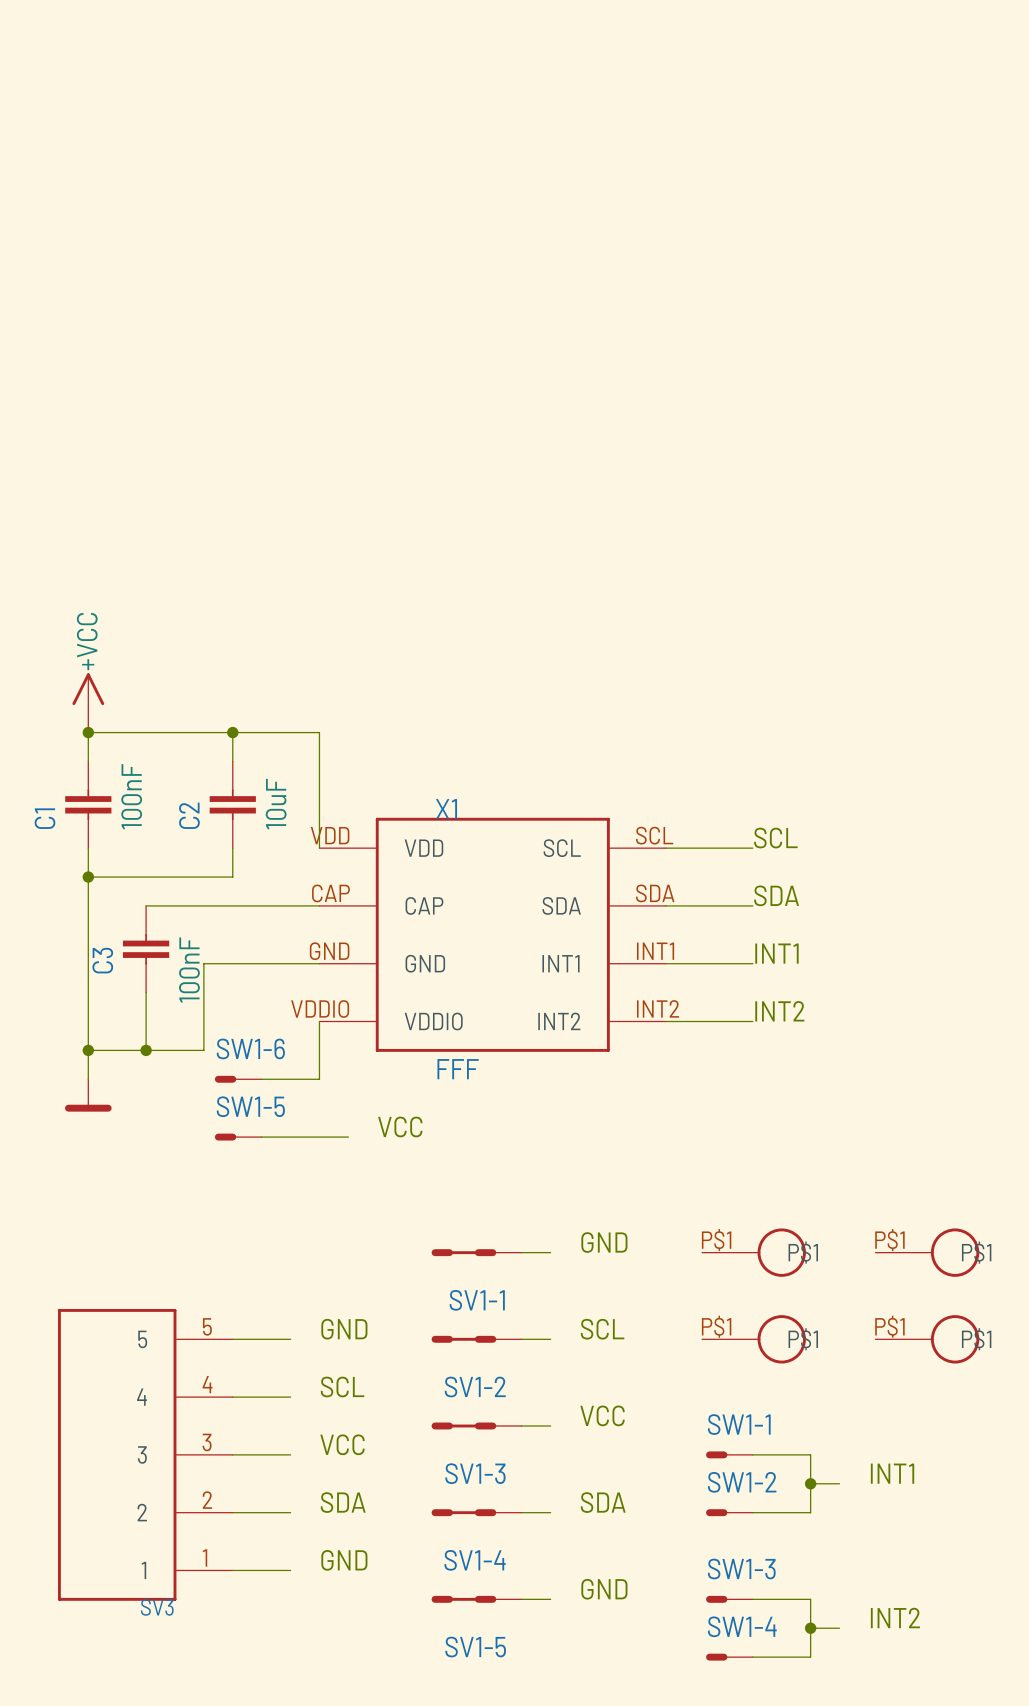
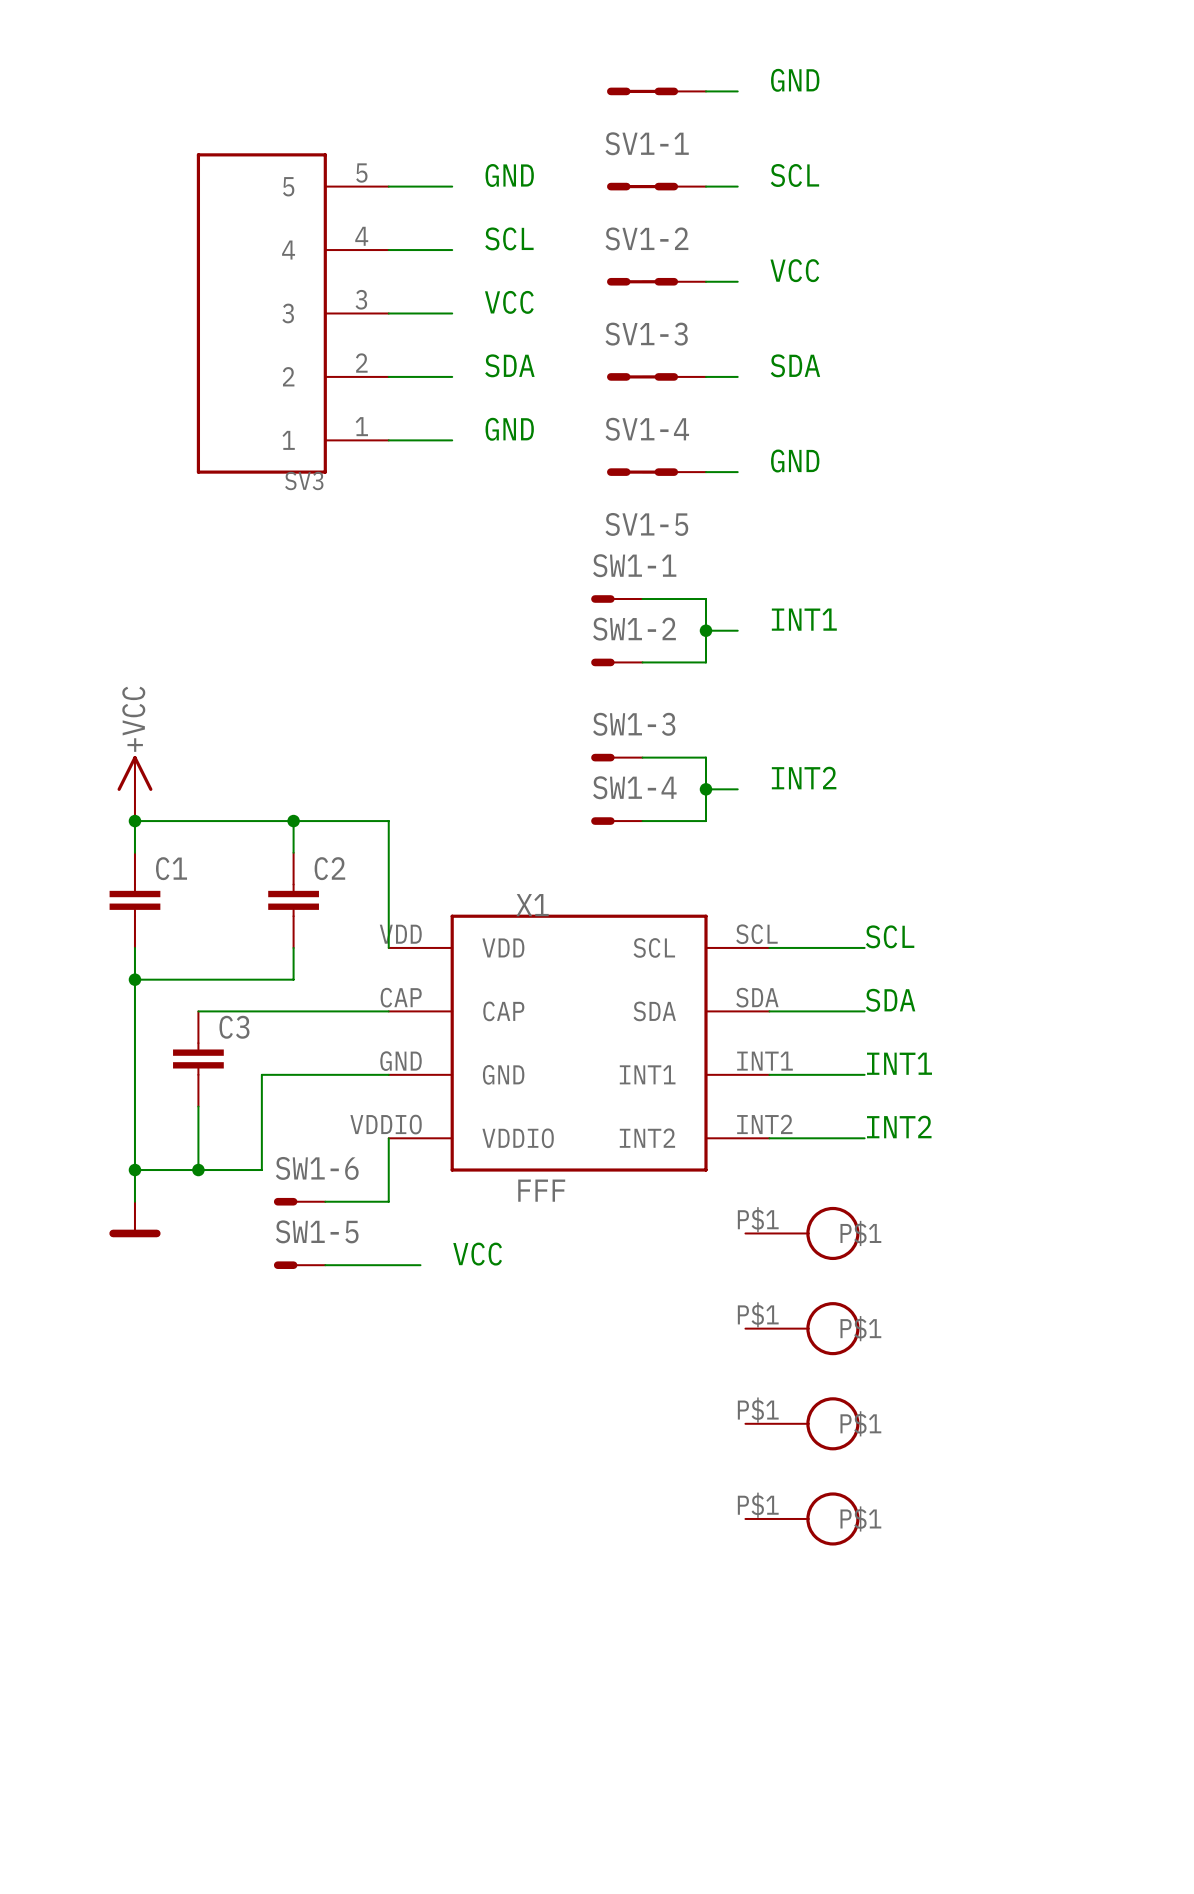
text: none -> GND (795, 80)
wire: none -> (705, 91) (737, 91)
text: none -> GND (509, 175)
text: none -> SCL (794, 175)
wire: none -> (388, 186) (452, 186)
wire: none -> (705, 186) (737, 186)
text: none -> SCL (509, 238)
wire: none -> (388, 250) (452, 250)
text: none -> VCC (794, 270)
wire: none -> (705, 281) (737, 281)
text: none -> VCC (509, 302)
wire: none -> (388, 313) (452, 313)
text: none -> SDA (509, 365)
text: none -> SDA (795, 365)
wire: none -> (388, 376) (452, 376)
wire: none -> (705, 376) (737, 376)
text: none -> GND (509, 429)
wire: none -> (388, 440) (452, 440)
text: none -> GND (795, 461)
wire: none -> (705, 472) (737, 472)
wire: none -> (642, 598) (705, 598) (705, 662) (642, 662)
text: none -> INT1 (804, 619)
wire: none -> (705, 630) (737, 630)
junction: none -> (705, 630)
wire: none -> (642, 757) (705, 757) (705, 821) (642, 821)
text: none -> INT2 (804, 778)
wire: none -> (705, 789) (737, 789)
junction: none -> (705, 789)
C1 value: 100nF (131, 796) -> none
C2 value: 10uF (276, 804) -> none
C2 name rotation: 0° (189, 815) -> 90° clockwise (329, 868)
C2 name position: C2 (189, 815) -> C2 (329, 868)
C1 name rotation: 0° (44, 818) -> 90° clockwise (171, 868)
C1 name position: C1 (44, 818) -> C1 (171, 868)
C3 name rotation: 0° (102, 960) -> 90° clockwise (234, 1027)
C3 name position: C3 (102, 960) -> C3 (234, 1027)
C3 value: 100nF (189, 970) -> none
part: none -> (802, 1233)
part: none -> (802, 1328)
text: GND (604, 1242) -> none
SV1-1 position: (476, 1252) -> (656, 91)
wire: (521, 1252) (550, 1252) -> none
part: (754, 1252) -> none
part: (927, 1252) -> none
part: none -> (802, 1423)
text: GND (344, 1329) -> none
text: SCL (602, 1329) -> none
wire: (232, 1339) (290, 1339) -> none
SV1-2 position: (476, 1339) -> (656, 186)
wire: (521, 1339) (550, 1339) -> none
part: (754, 1339) -> none
part: (927, 1339) -> none
part: none -> (802, 1518)
text: SCL (342, 1387) -> none
wire: (232, 1397) (290, 1397) -> none
text: VCC (602, 1415) -> none
SV1-3 position: (476, 1425) -> (656, 281)
wire: (521, 1425) (550, 1425) -> none
text: VCC (342, 1444) -> none
SV3 position: (145, 1454) -> (292, 313)
wire: (232, 1454) (290, 1454) -> none
SW1-1 position: (729, 1454) -> (616, 598)
wire: (752, 1454) (810, 1454) (810, 1512) (752, 1512) -> none
text: INT1 (892, 1473) -> none
wire: (810, 1483) (839, 1483) -> none
junction: (810, 1483) -> none
text: SDA (343, 1502) -> none
text: SDA (603, 1502) -> none
wire: (232, 1512) (290, 1512) -> none
SV1-4 position: (476, 1512) -> (656, 376)
wire: (521, 1512) (550, 1512) -> none
SW1-2 position: (729, 1512) -> (616, 662)
text: GND (344, 1560) -> none
wire: (232, 1570) (290, 1570) -> none
text: GND (604, 1589) -> none
SV1-5 position: (476, 1599) -> (656, 472)
wire: (521, 1599) (550, 1599) -> none
SW1-3 position: (729, 1599) -> (616, 757)
wire: (752, 1599) (810, 1599) (810, 1657) (752, 1657) -> none
text: INT2 (895, 1618) -> none
wire: (810, 1628) (839, 1628) -> none
junction: (810, 1628) -> none
SW1-4 position: (729, 1657) -> (616, 821)

